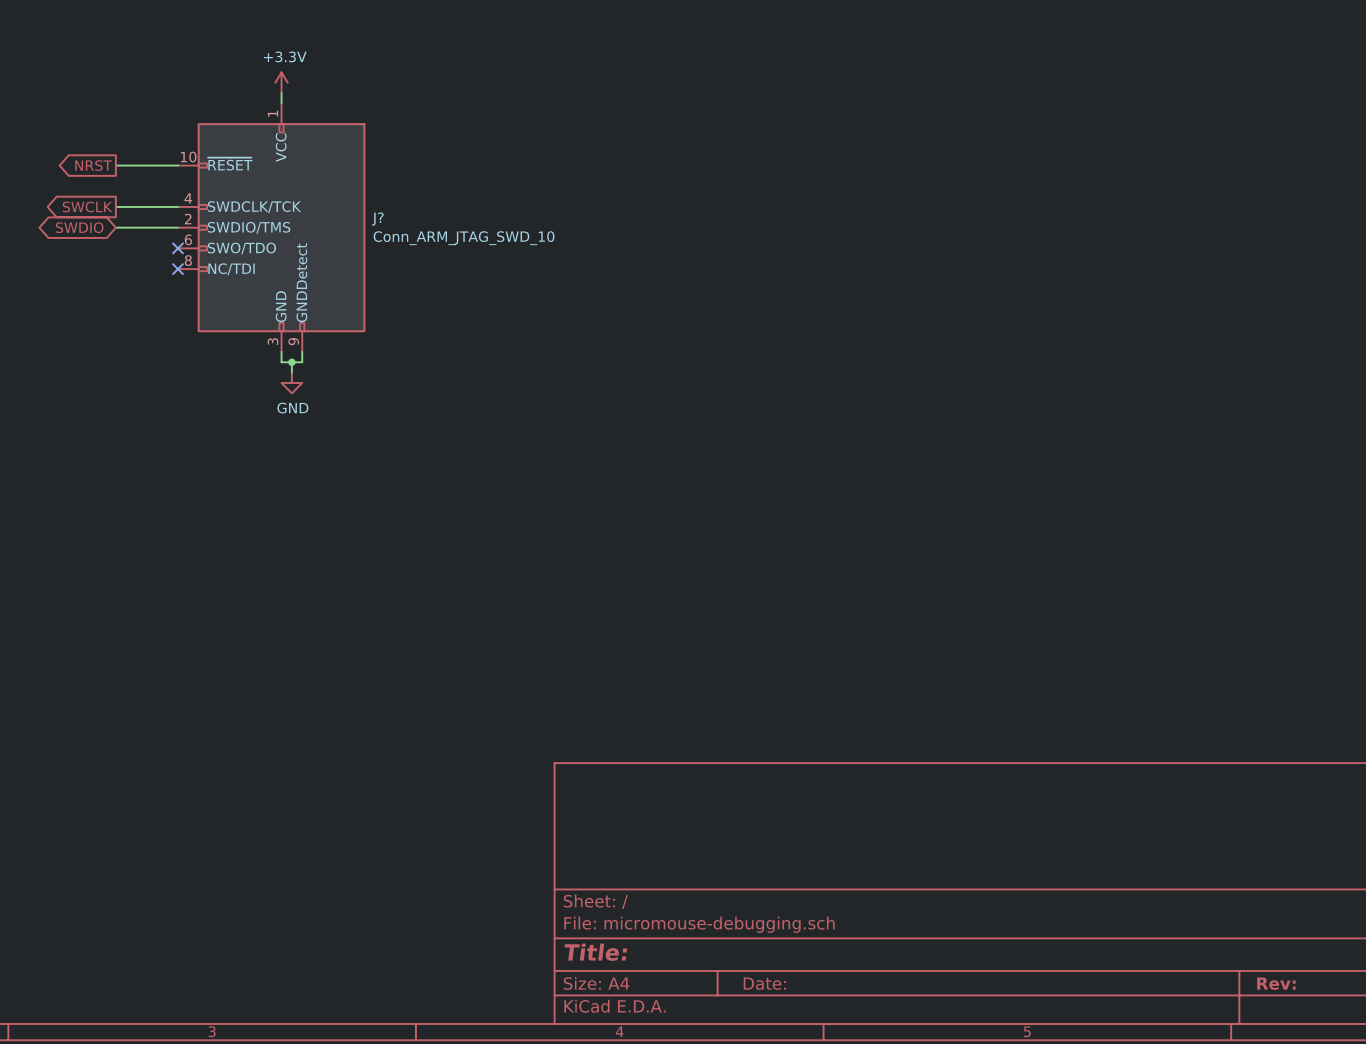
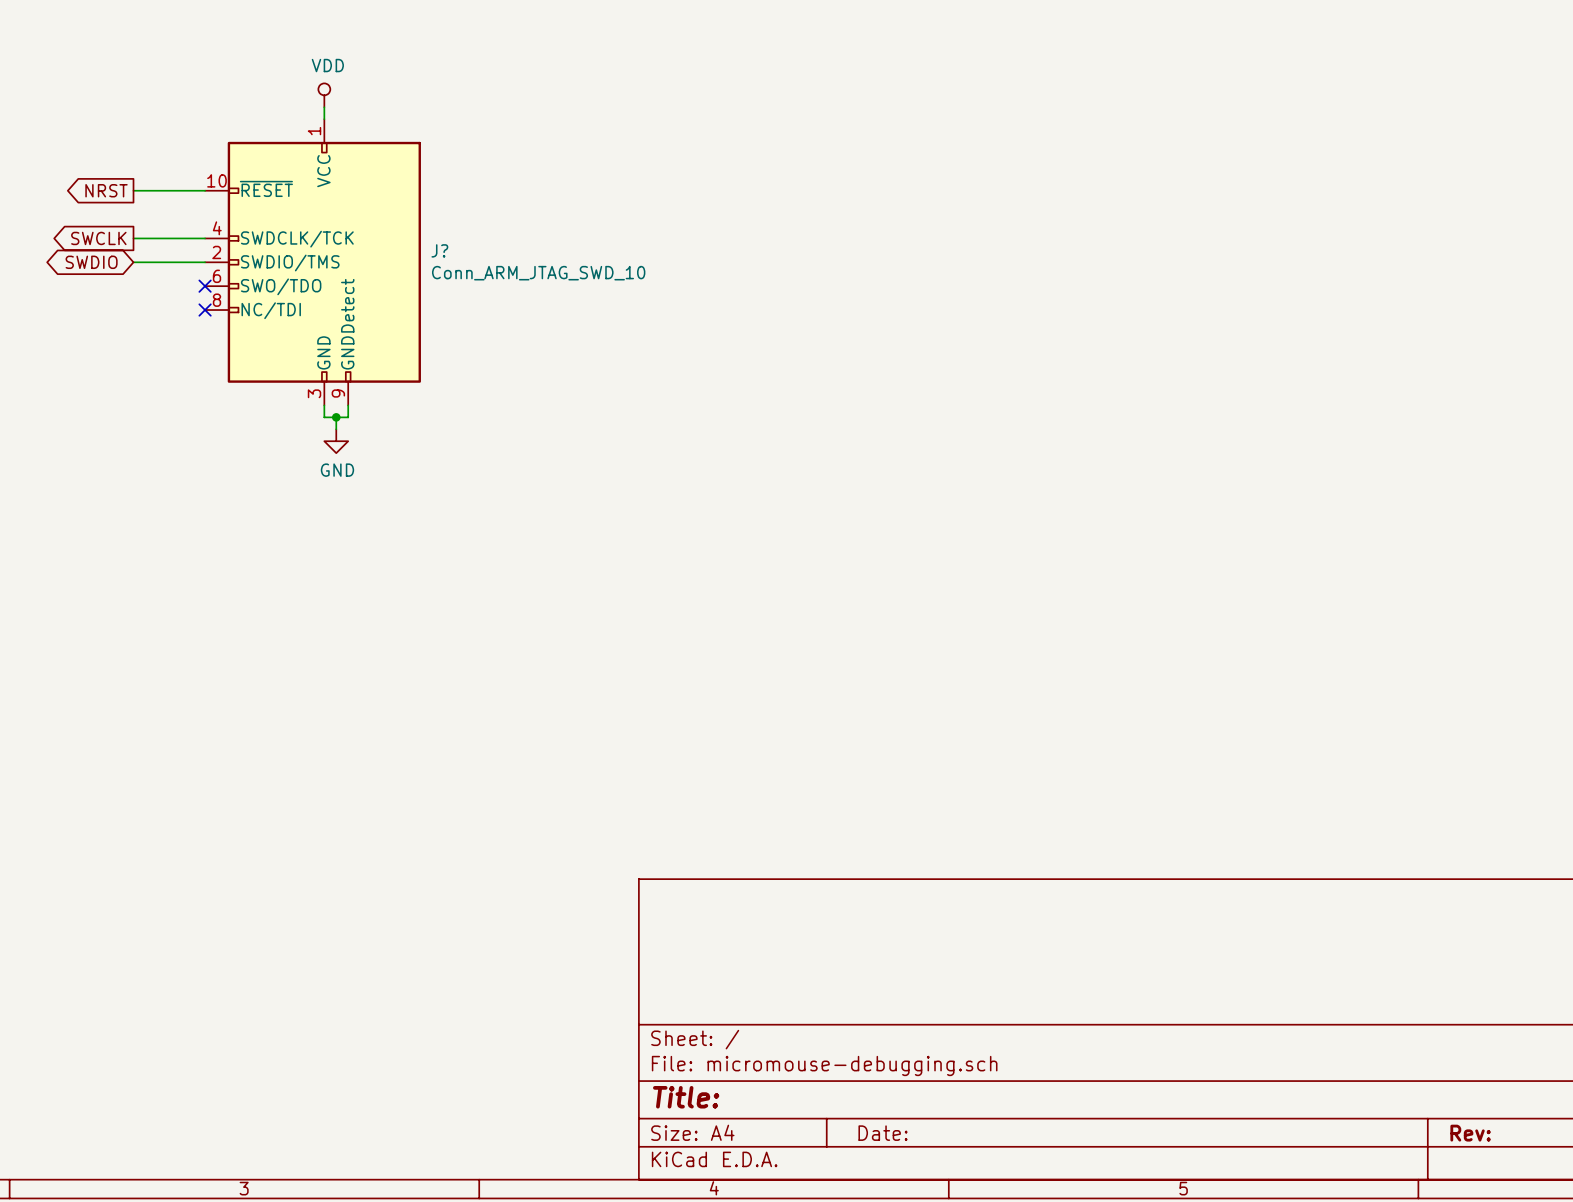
power symbol: +3.3V (281, 82) -> VDD (324, 95)

